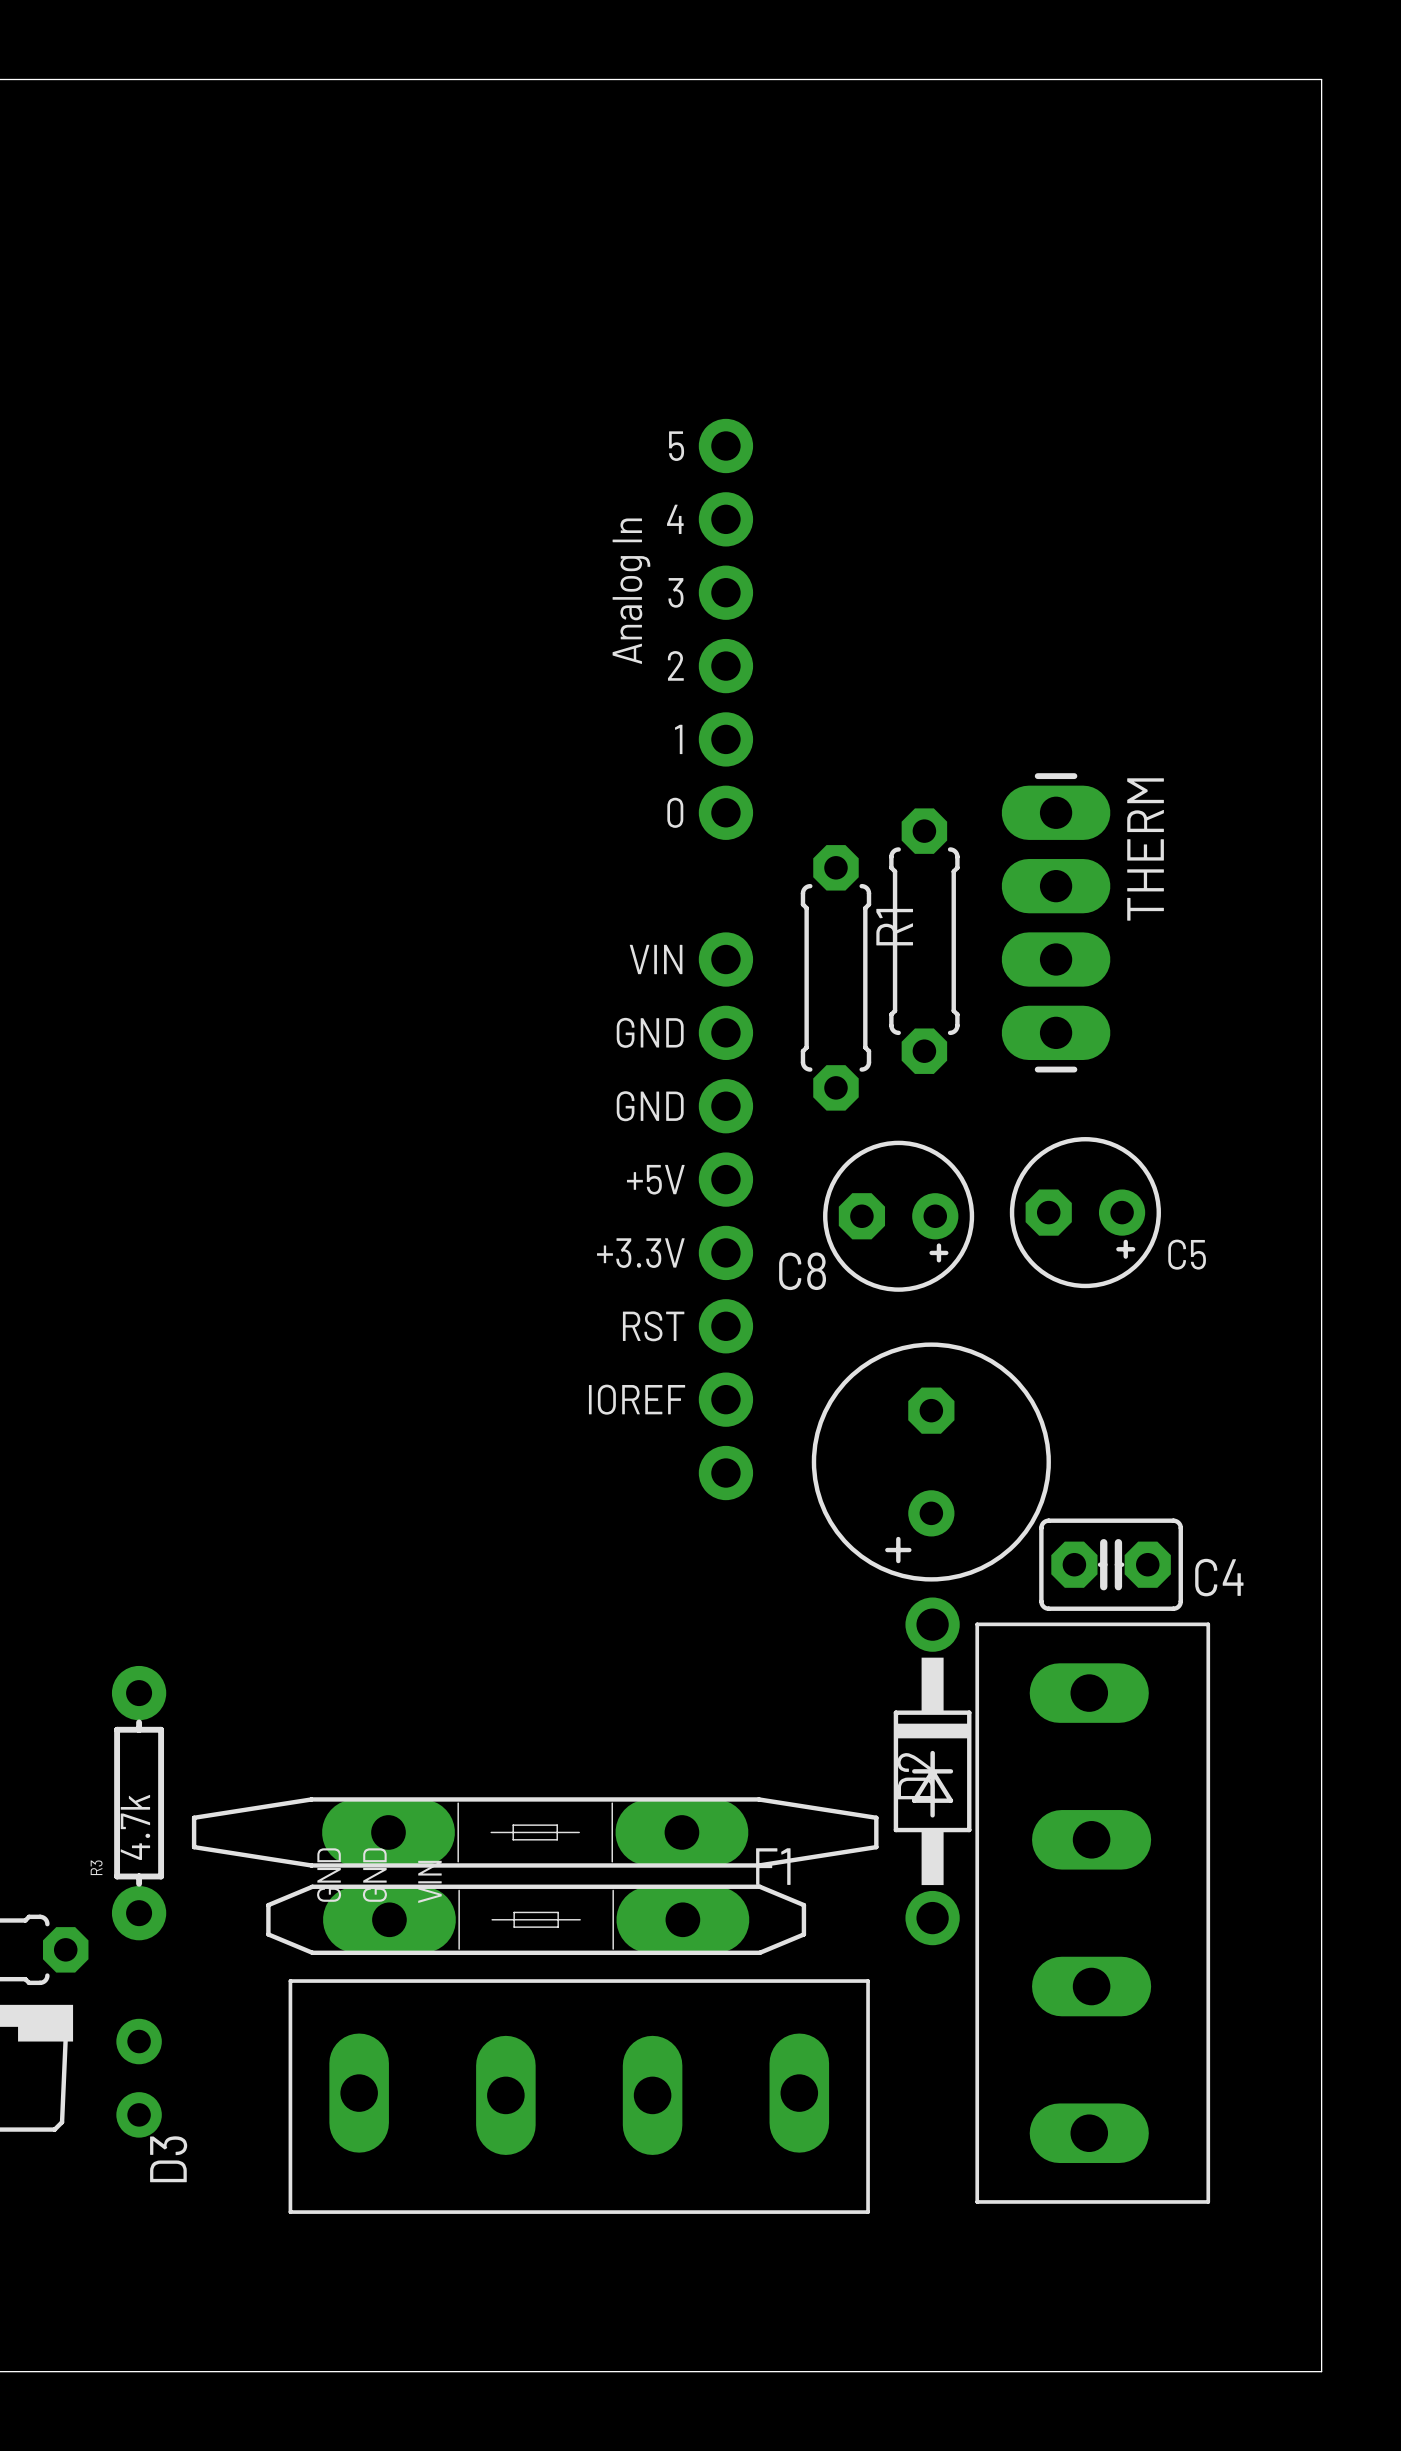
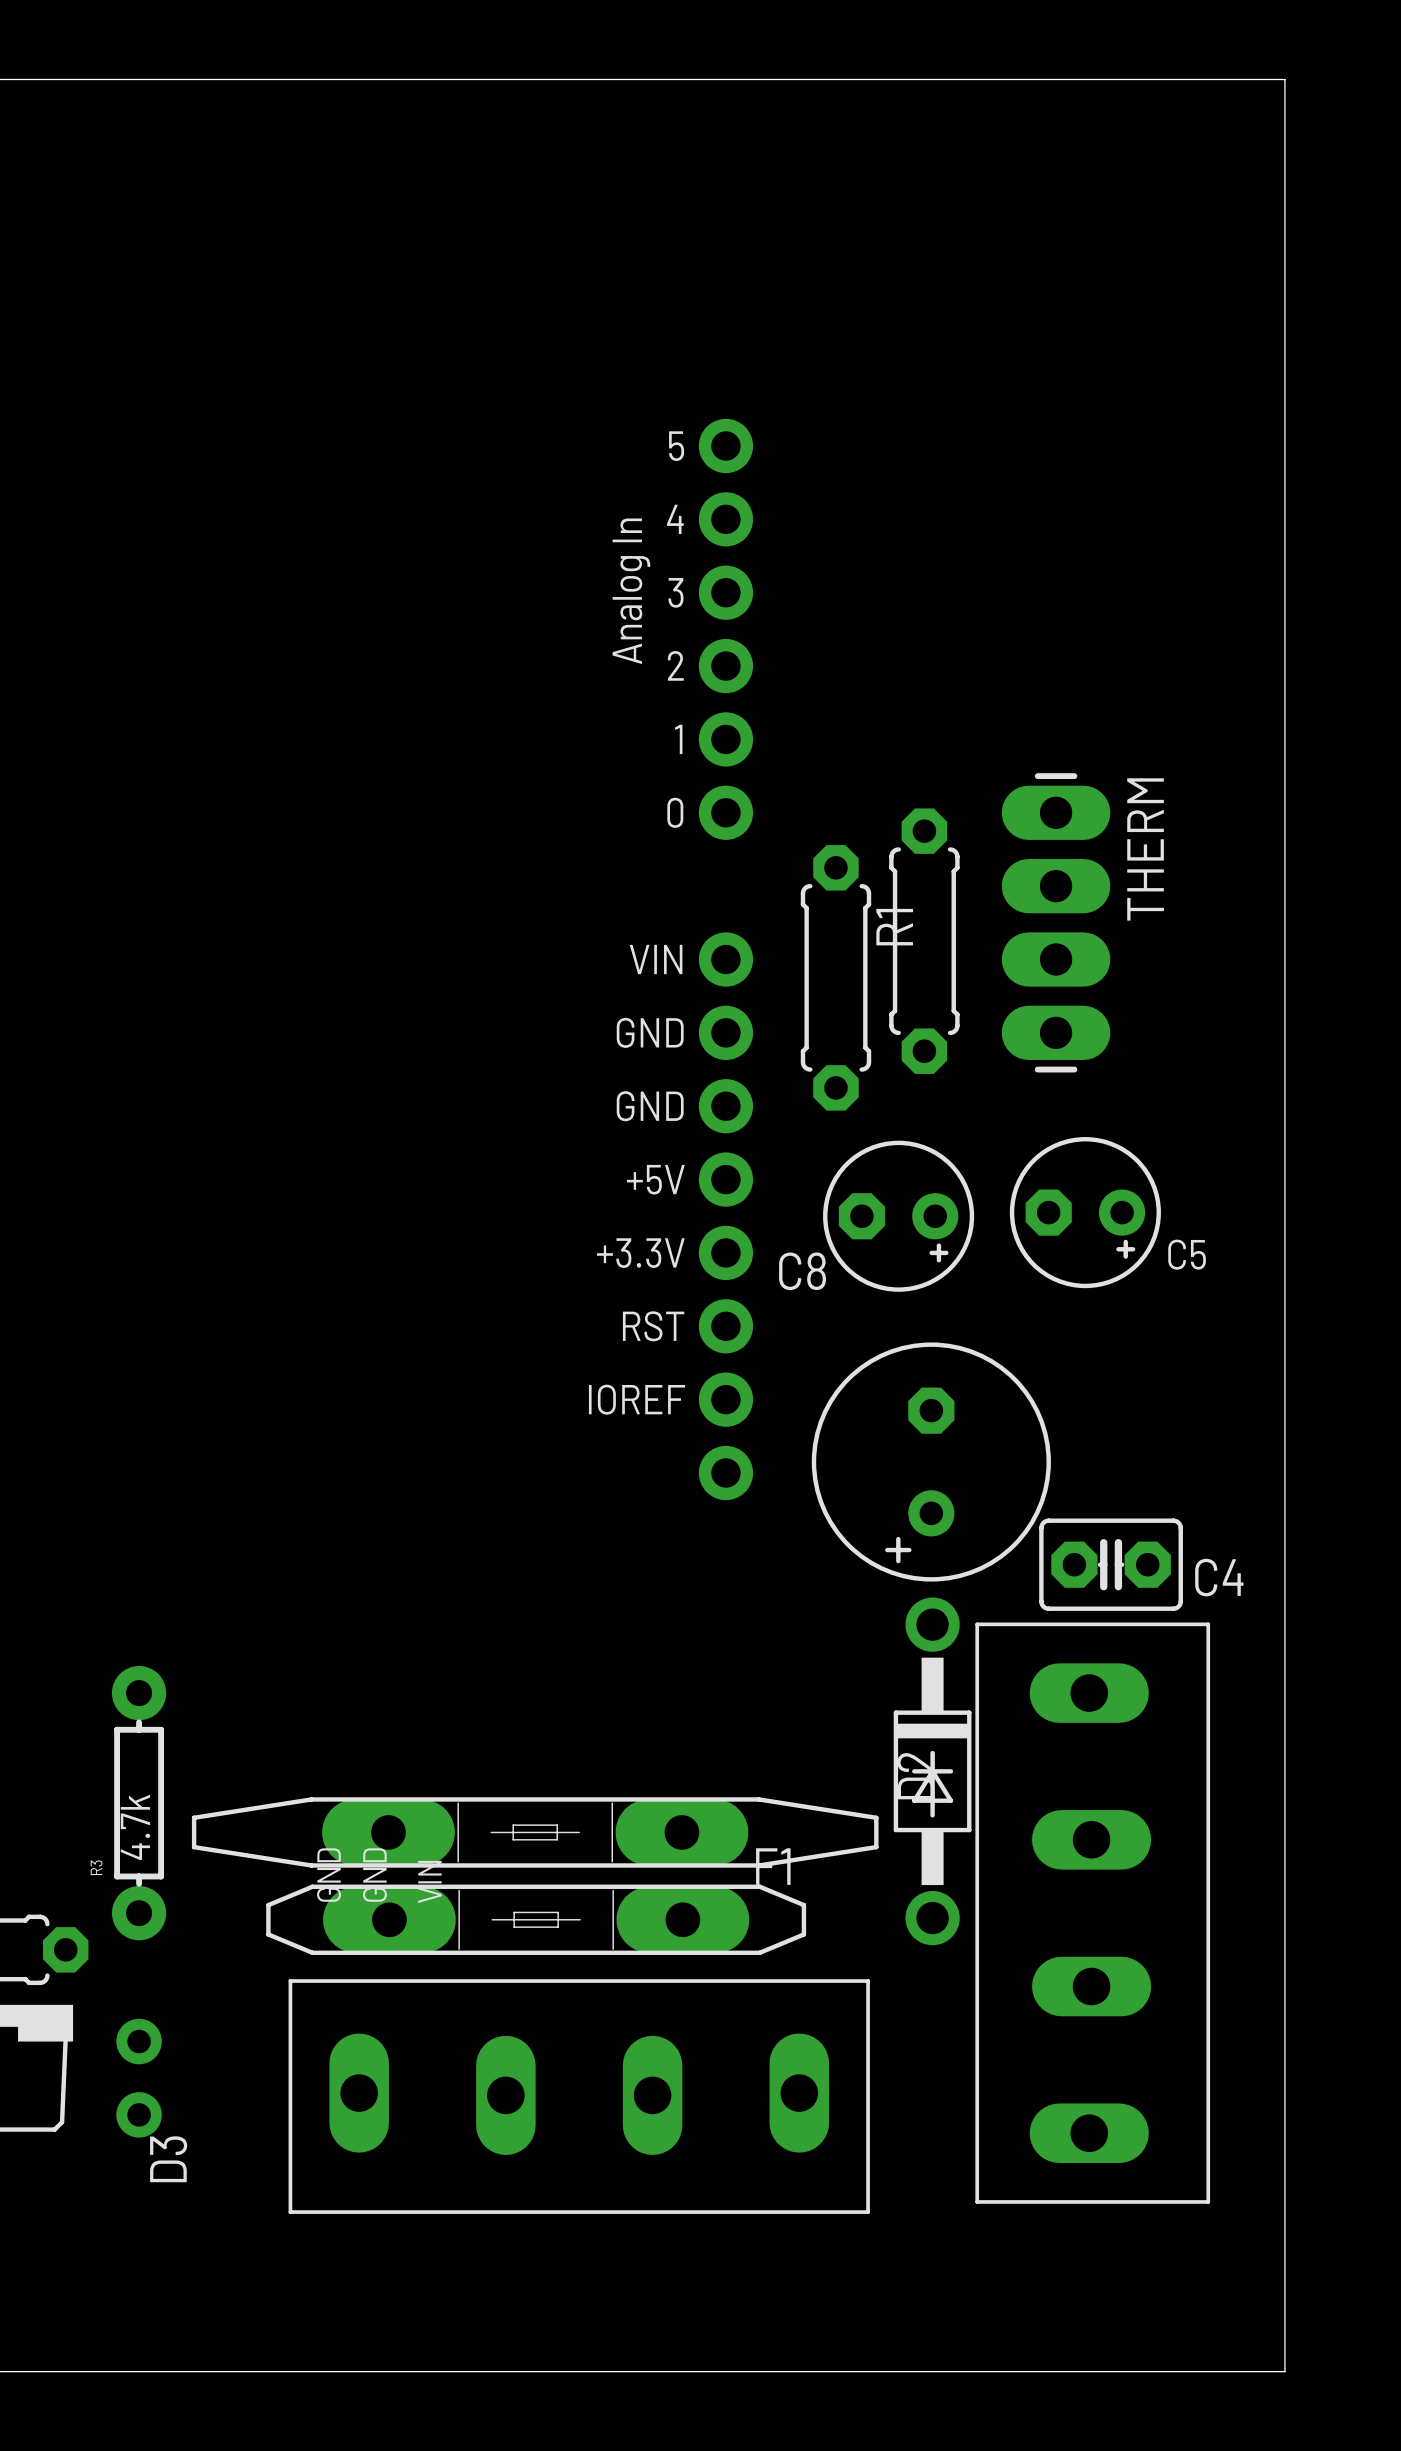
board edge: (1284, 79) (1321, 79) (1321, 2371) (1284, 2371) -> (1284, 79) (1284, 2371)

